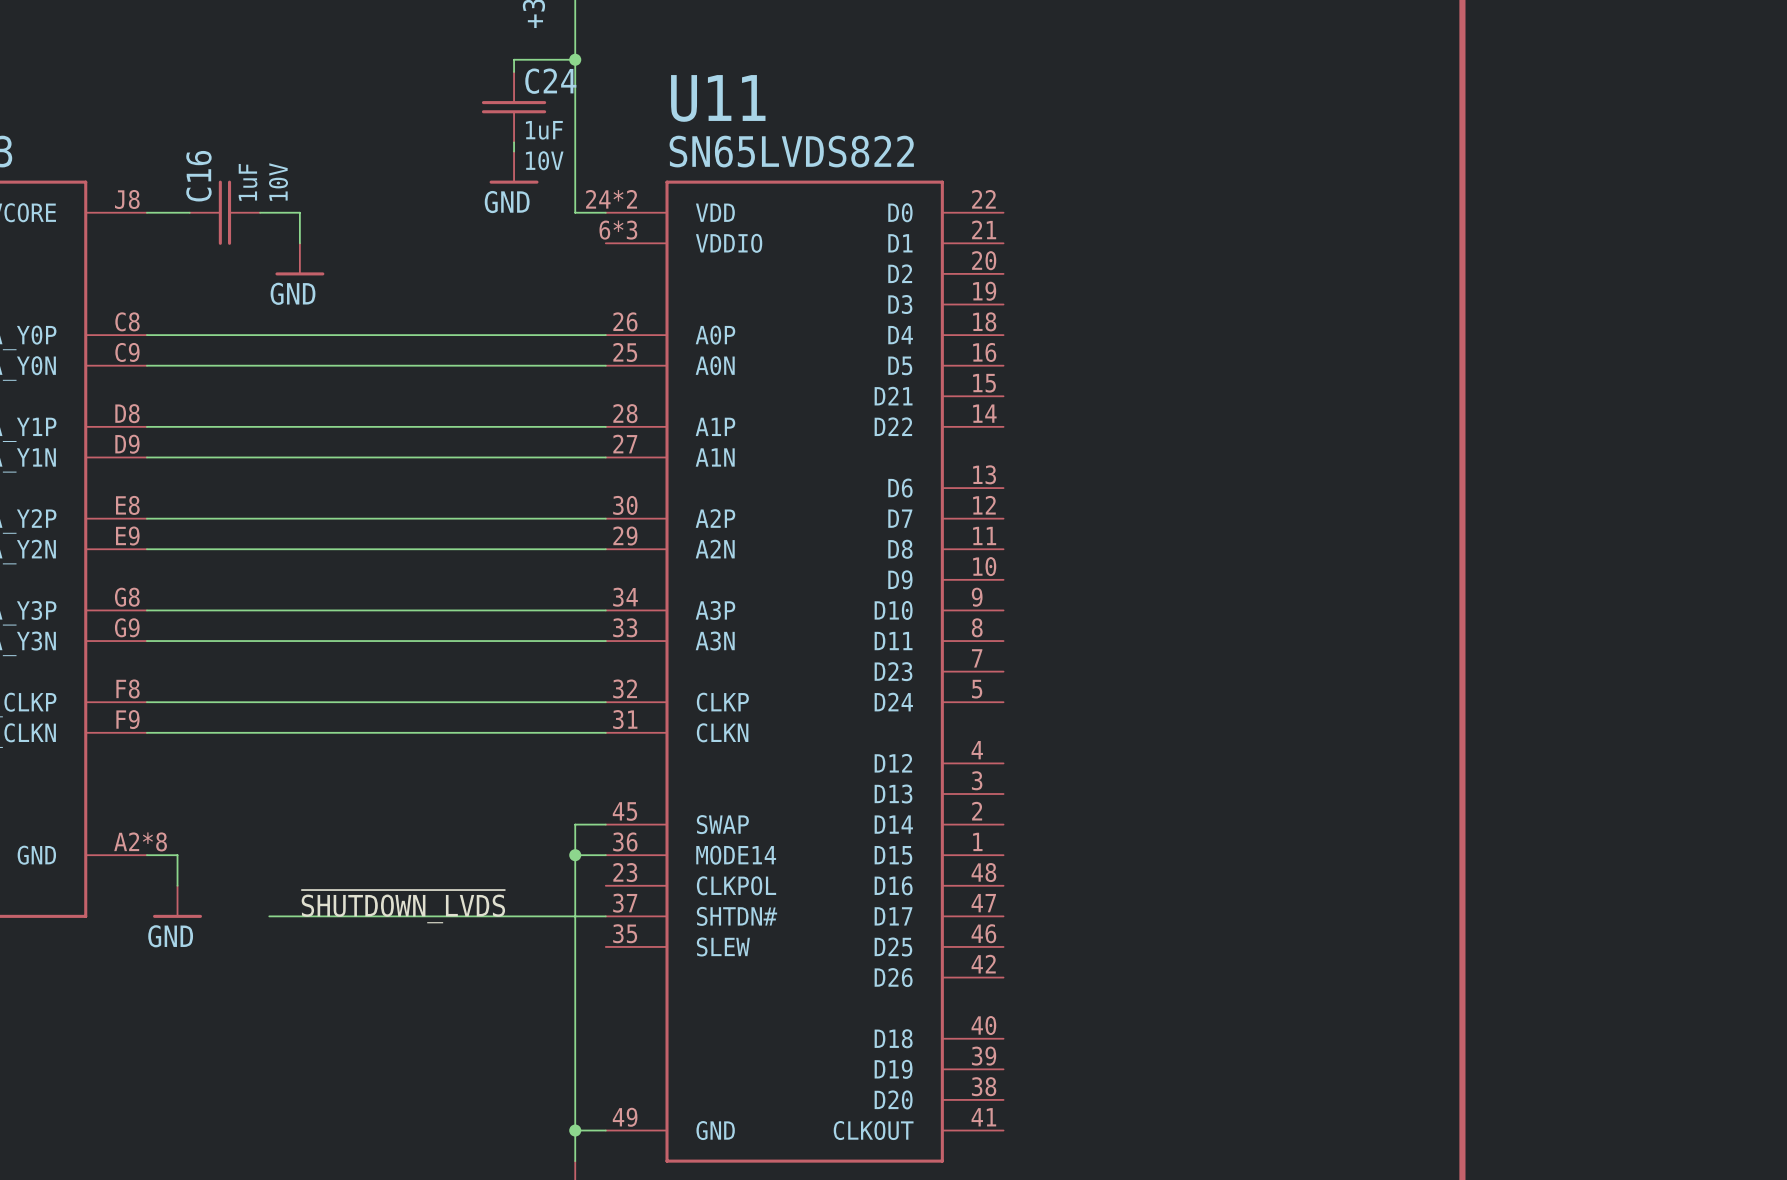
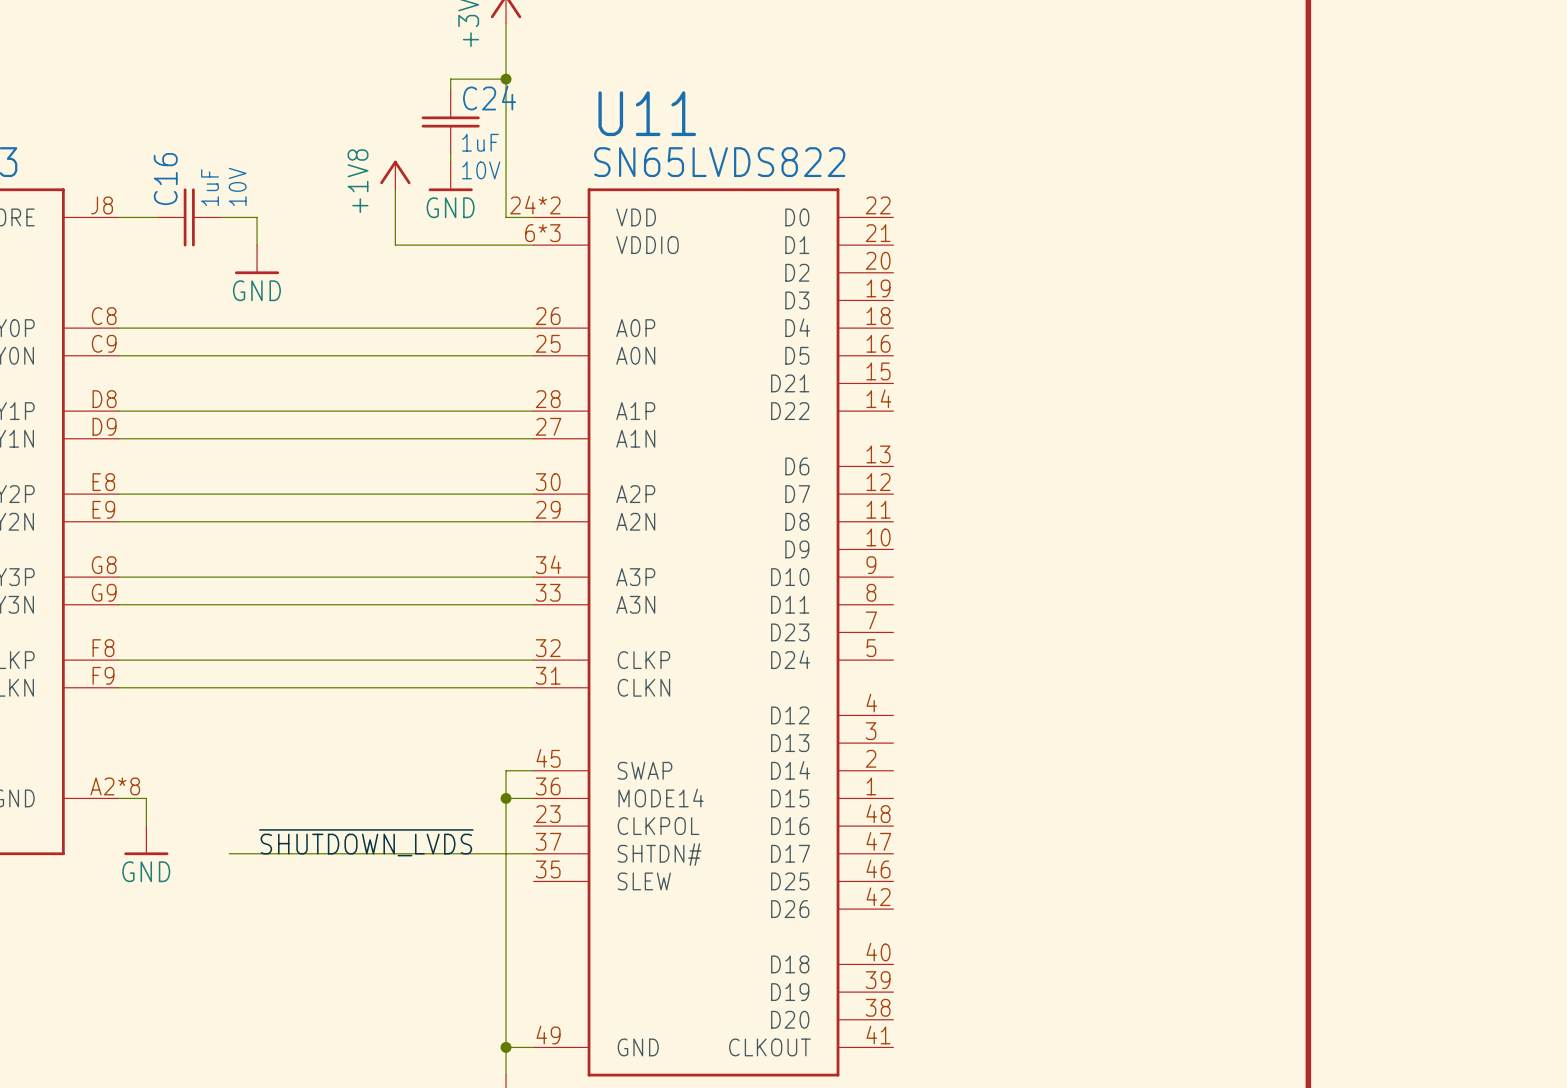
power symbol: none -> +1V8 (395, 175)
wire: none -> (395, 189) (395, 245) (533, 245)

